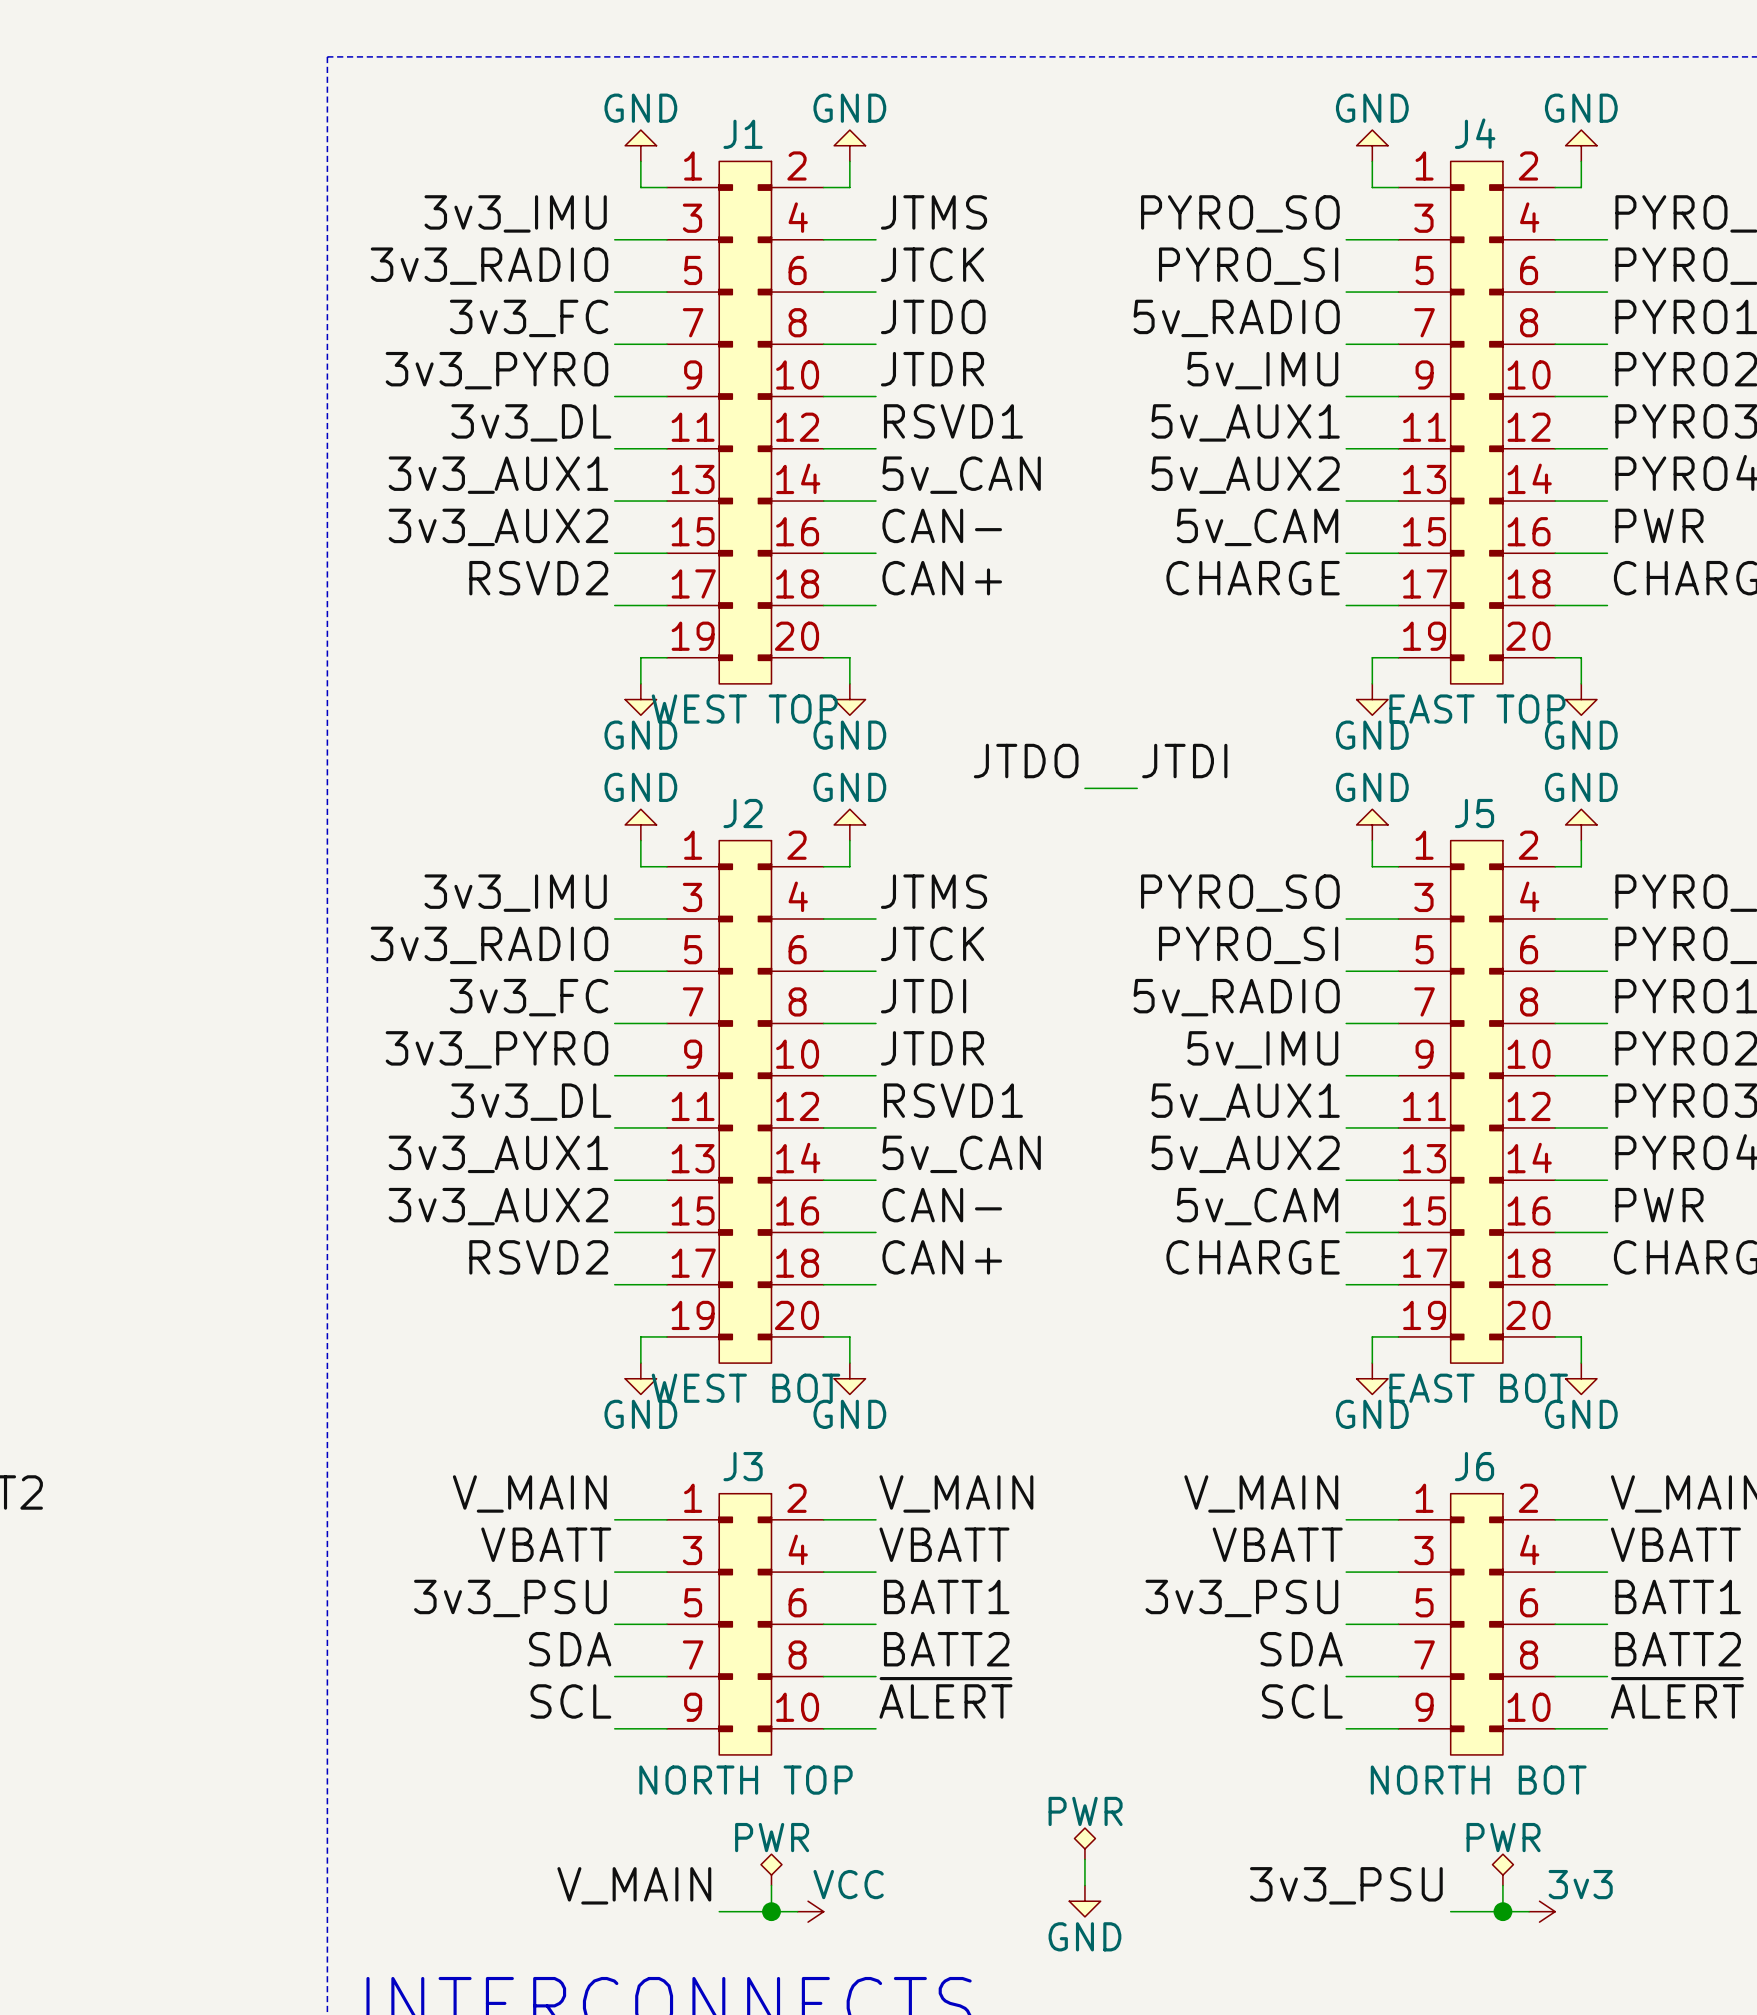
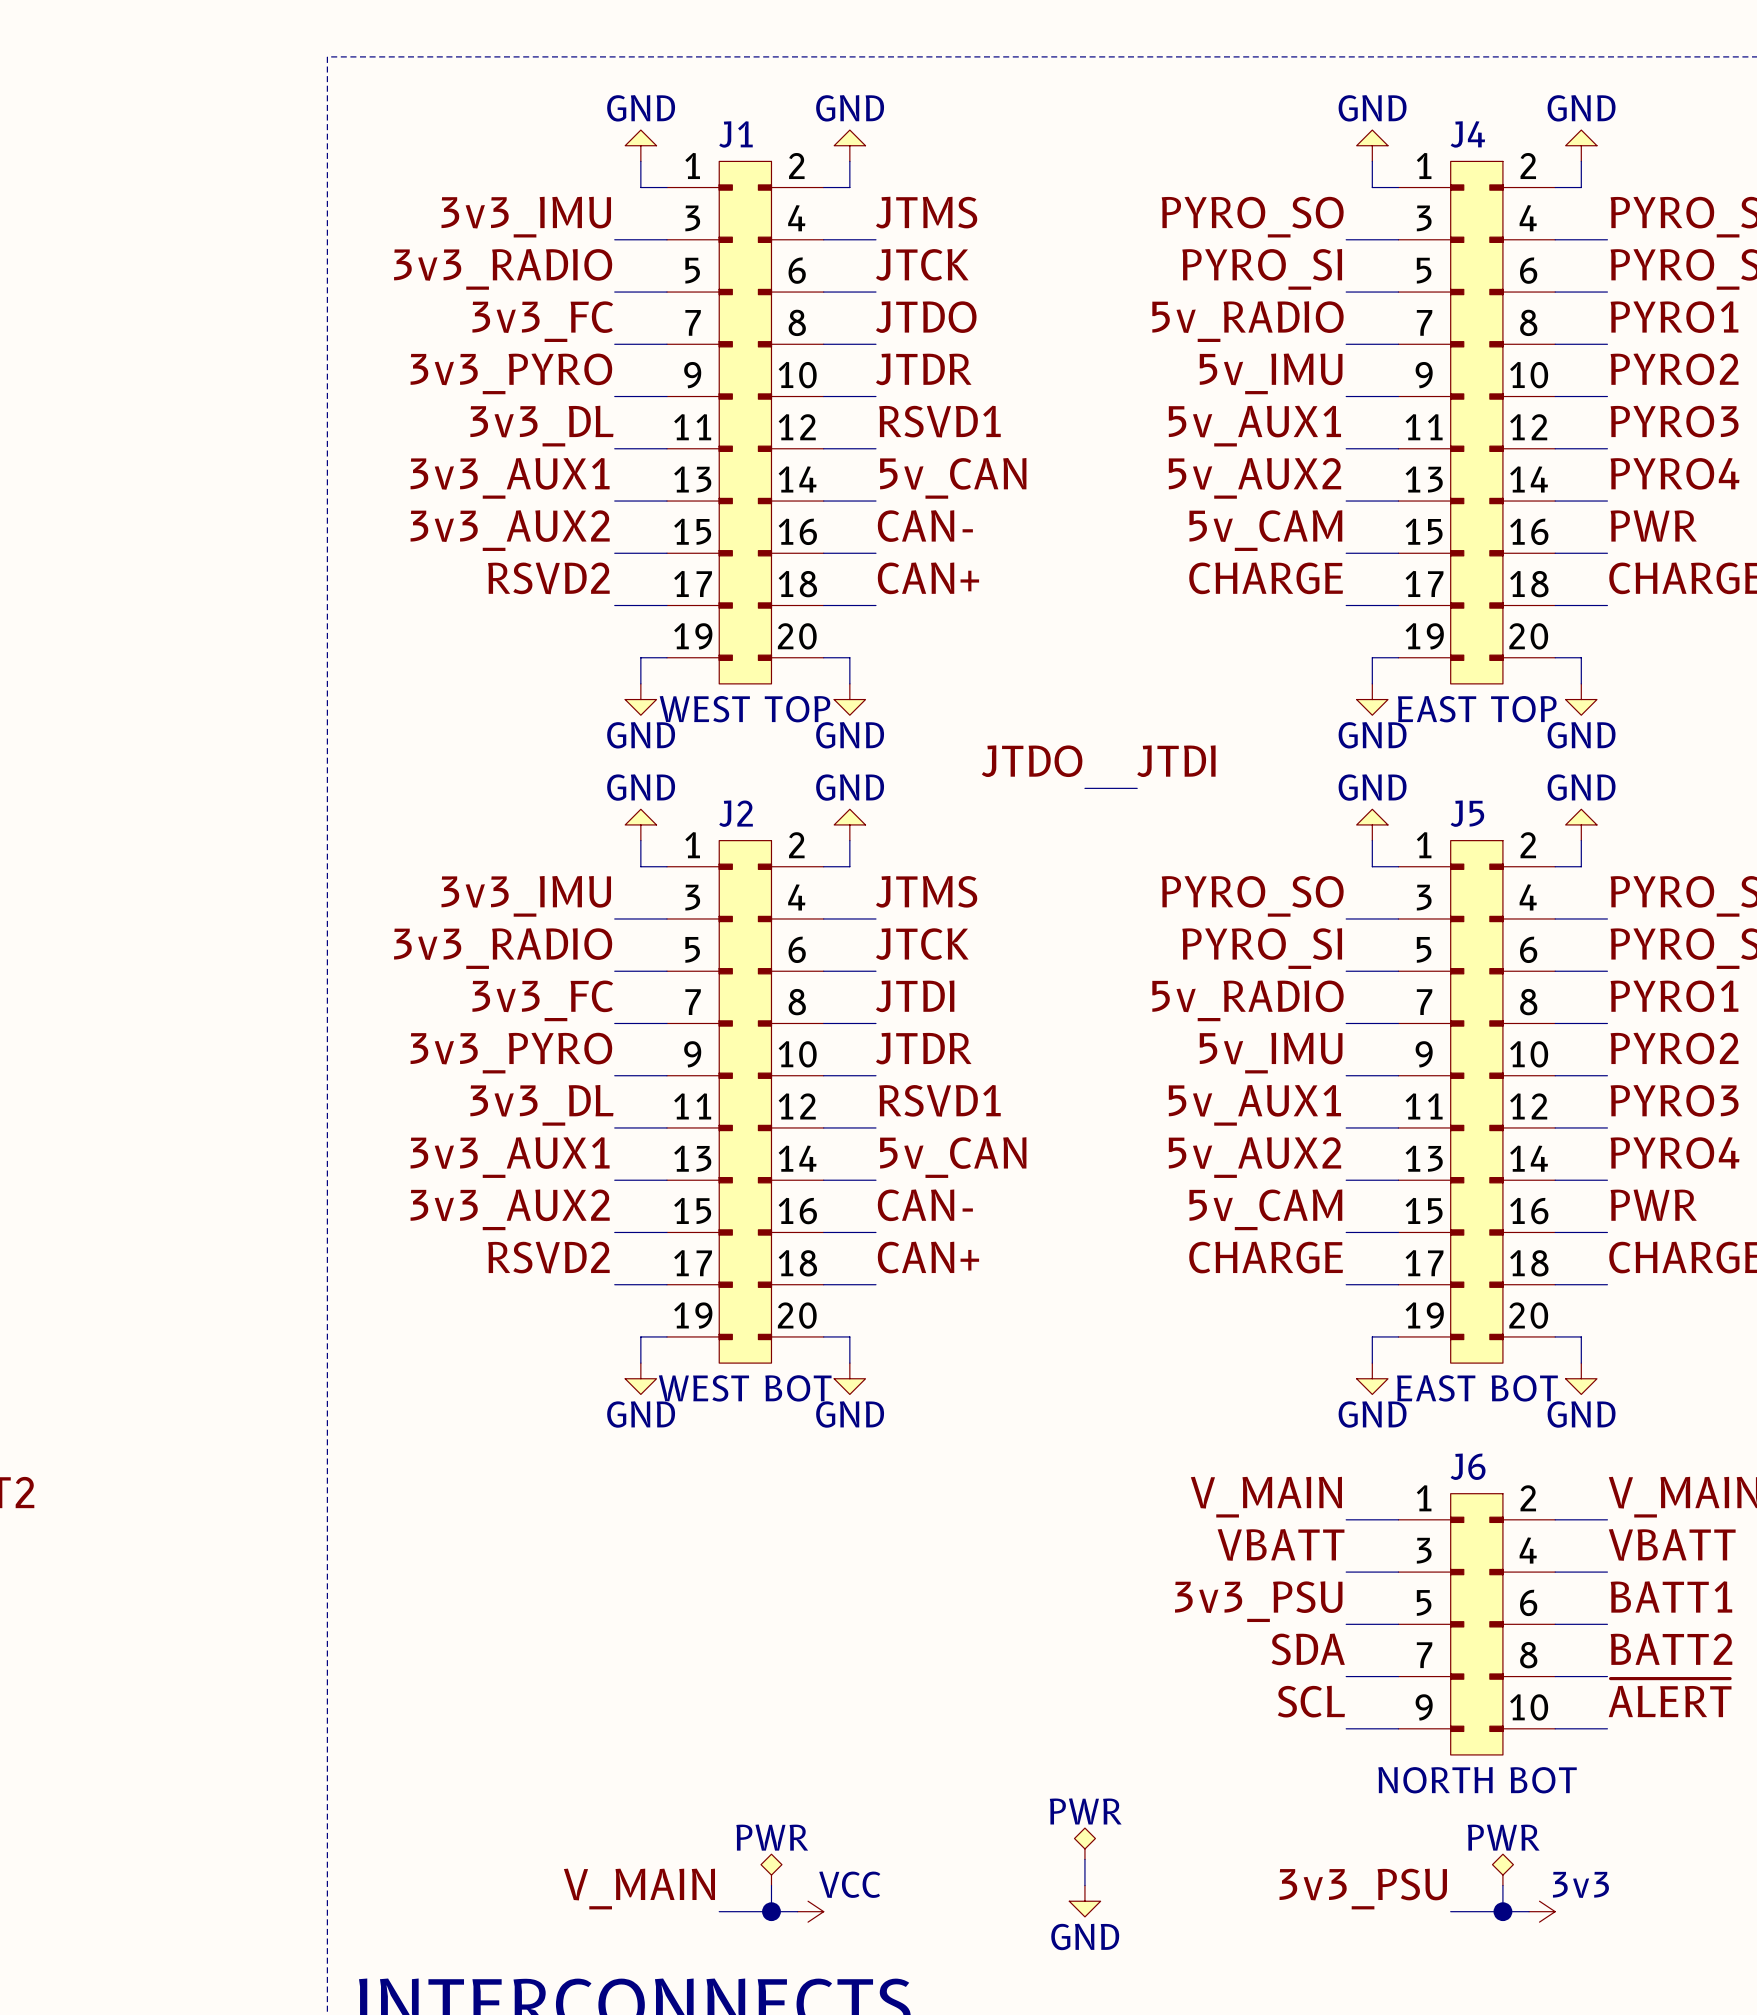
label: V_MAIN (529, 1493) -> none
label: V_MAIN (956, 1493) -> none
wire: (614, 1519) (666, 1519) -> none
wire: (823, 1519) (875, 1519) -> none
label: VBATT (546, 1544) -> none
label: VBATT (944, 1544) -> none
wire: (614, 1572) (666, 1572) -> none
wire: (823, 1572) (875, 1572) -> none
label: BATT1 (946, 1596) -> none
label: 3v3_PSU (510, 1598) -> none
wire: (614, 1624) (666, 1624) -> none
J3: NORTH TOP (745, 1624) -> none
wire: (823, 1624) (875, 1624) -> none
label: SDA (570, 1649) -> none
label: BATT2 (946, 1649) -> none
wire: (614, 1676) (666, 1676) -> none
wire: (823, 1676) (875, 1676) -> none
label: ~{ALERT} (945, 1697) -> none
label: SCL (570, 1701) -> none
wire: (614, 1728) (666, 1728) -> none
wire: (823, 1728) (875, 1728) -> none

